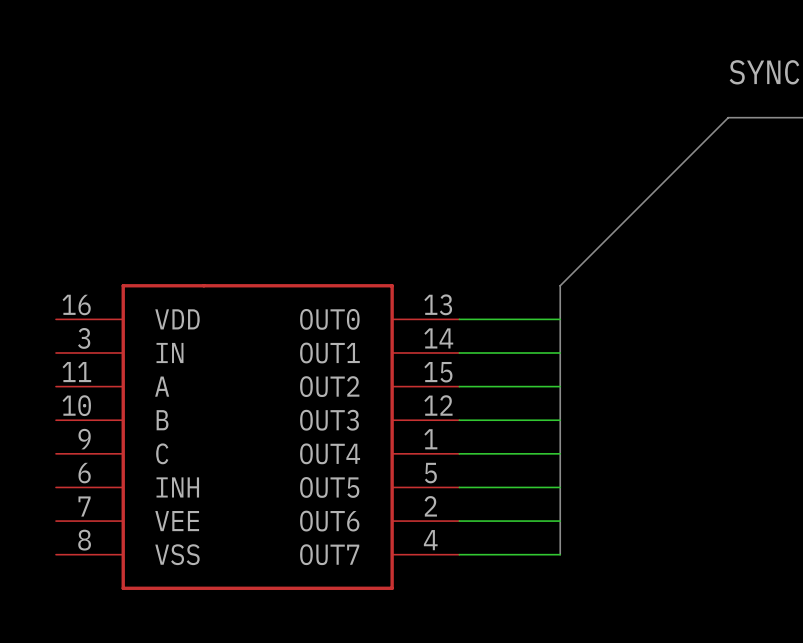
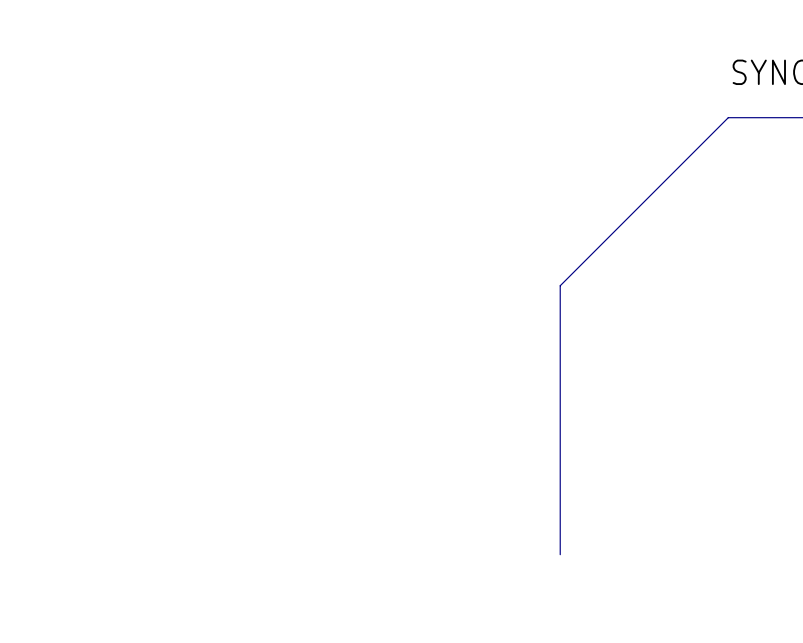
wire: (459, 319) (560, 319) -> none
wire: (459, 352) (560, 352) -> none
wire: (459, 386) (560, 386) -> none
wire: (459, 420) (560, 420) -> none
part: (257, 437) -> none
wire: (459, 453) (560, 453) -> none
wire: (459, 487) (560, 487) -> none
wire: (459, 521) (560, 521) -> none
wire: (459, 554) (560, 554) -> none

